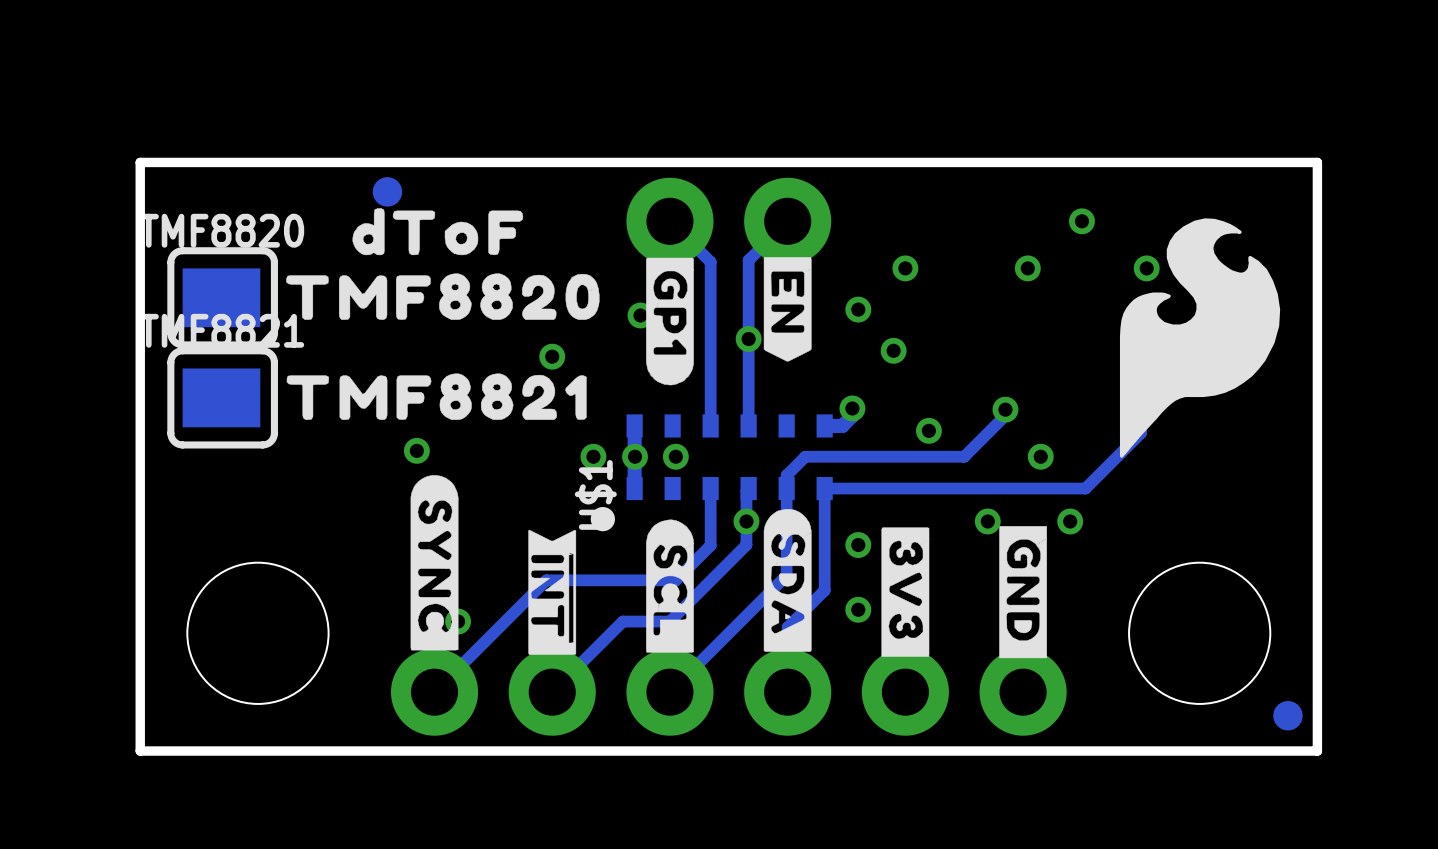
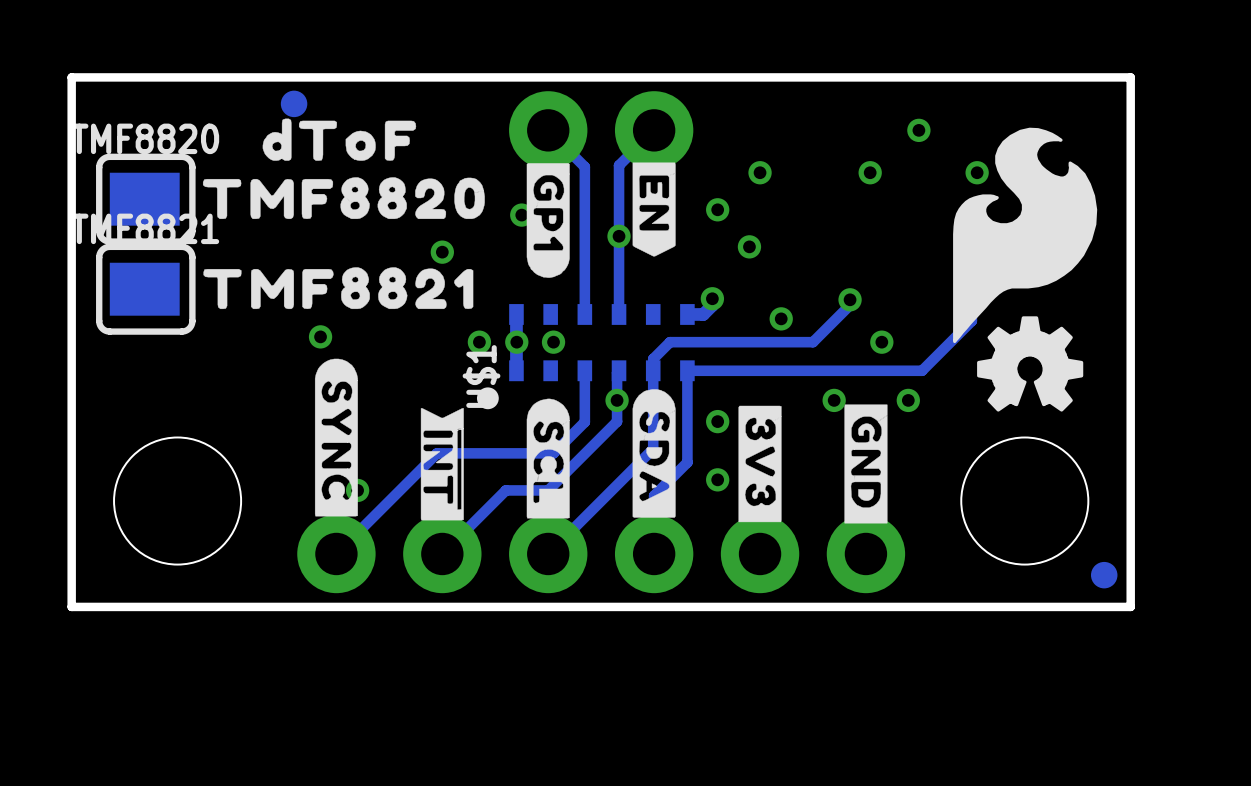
drawing: none -> [977, 316, 1084, 412]

